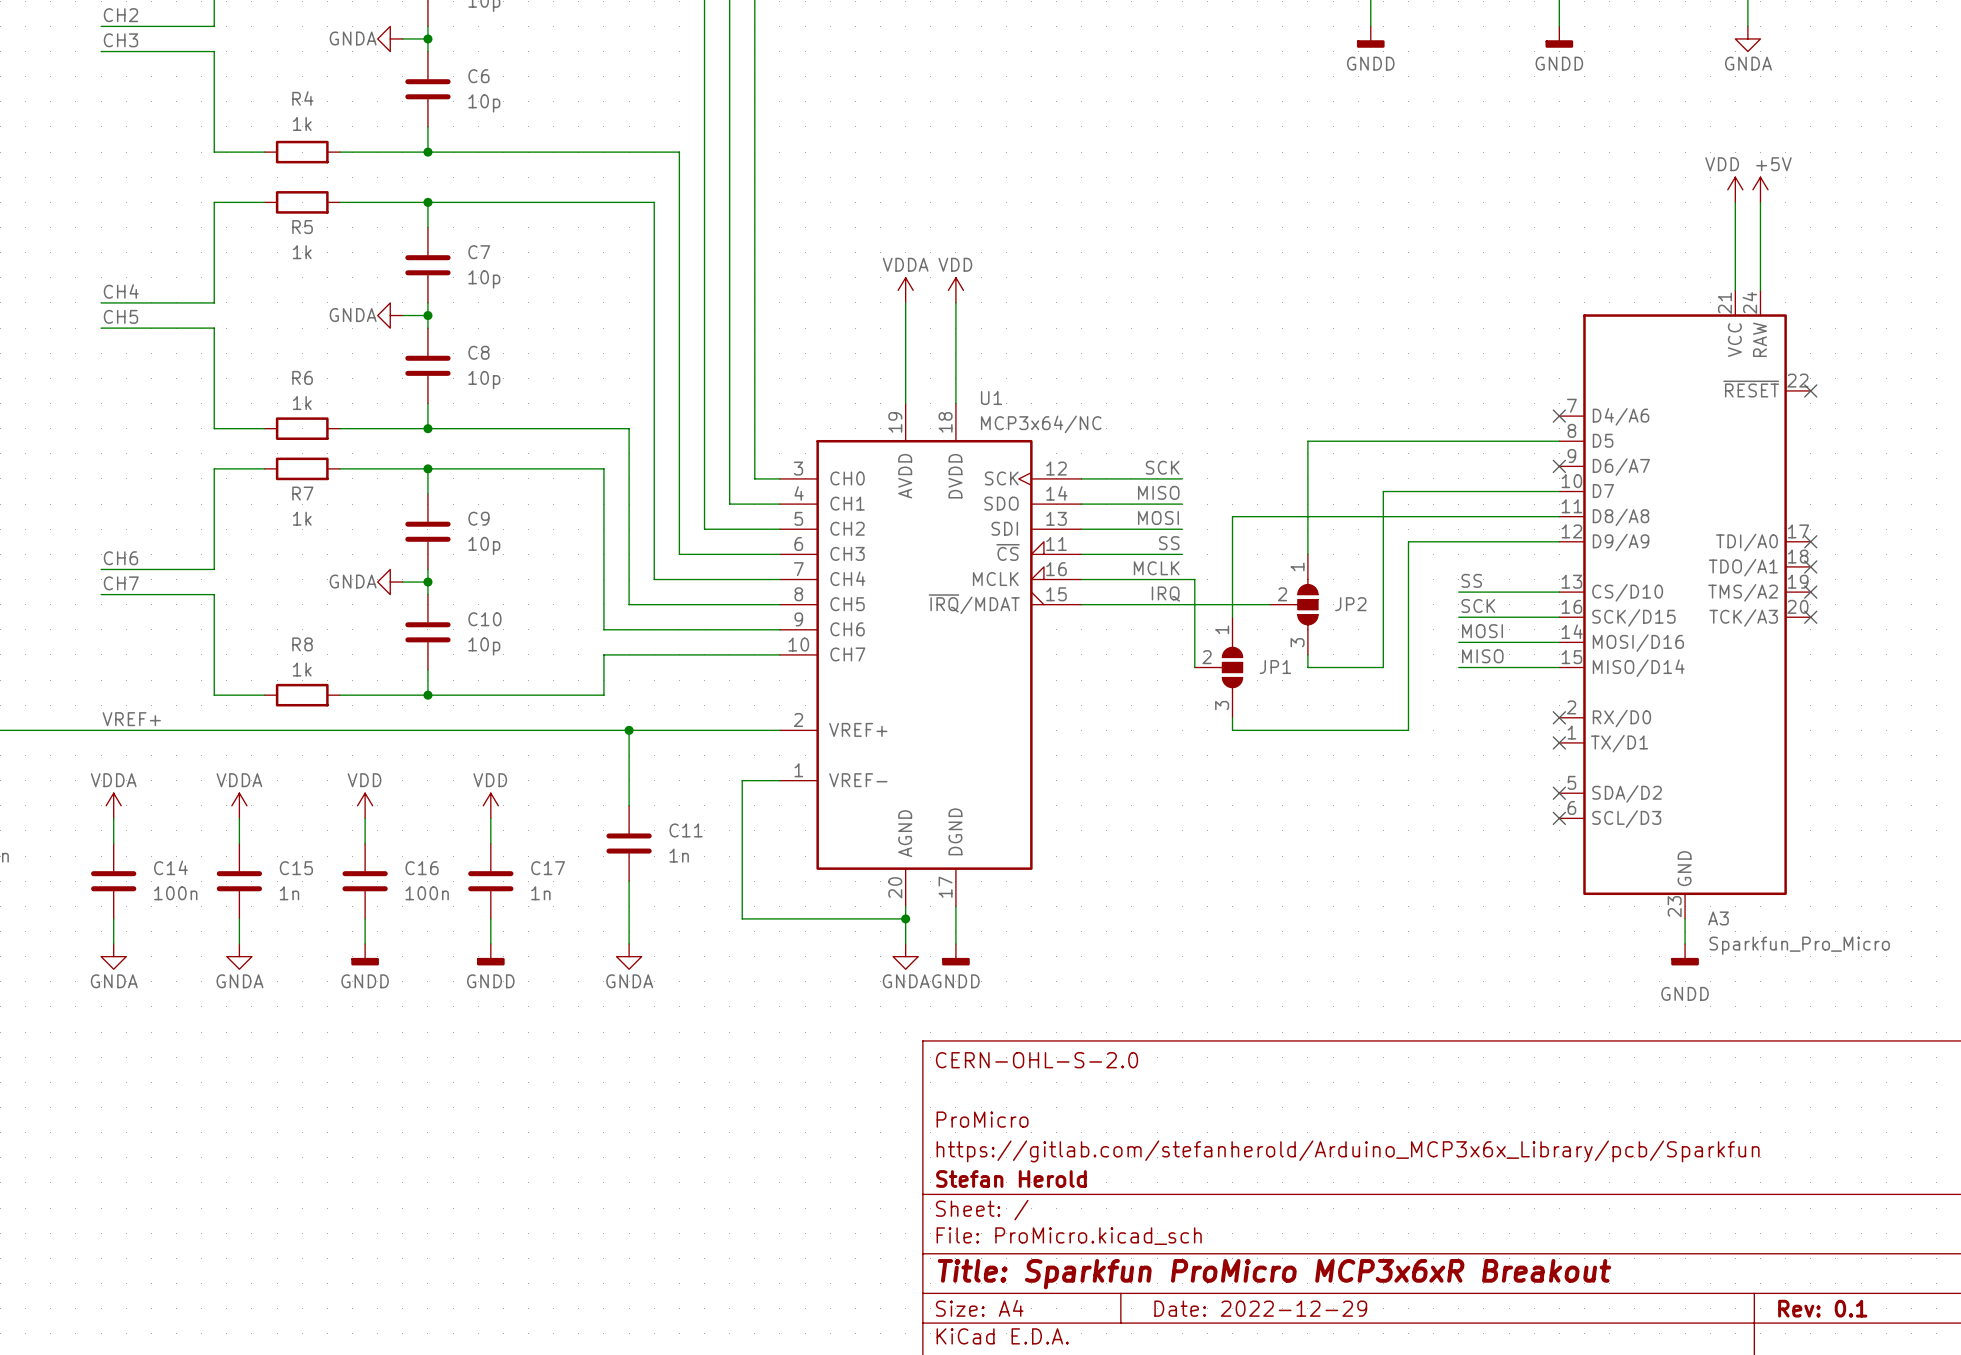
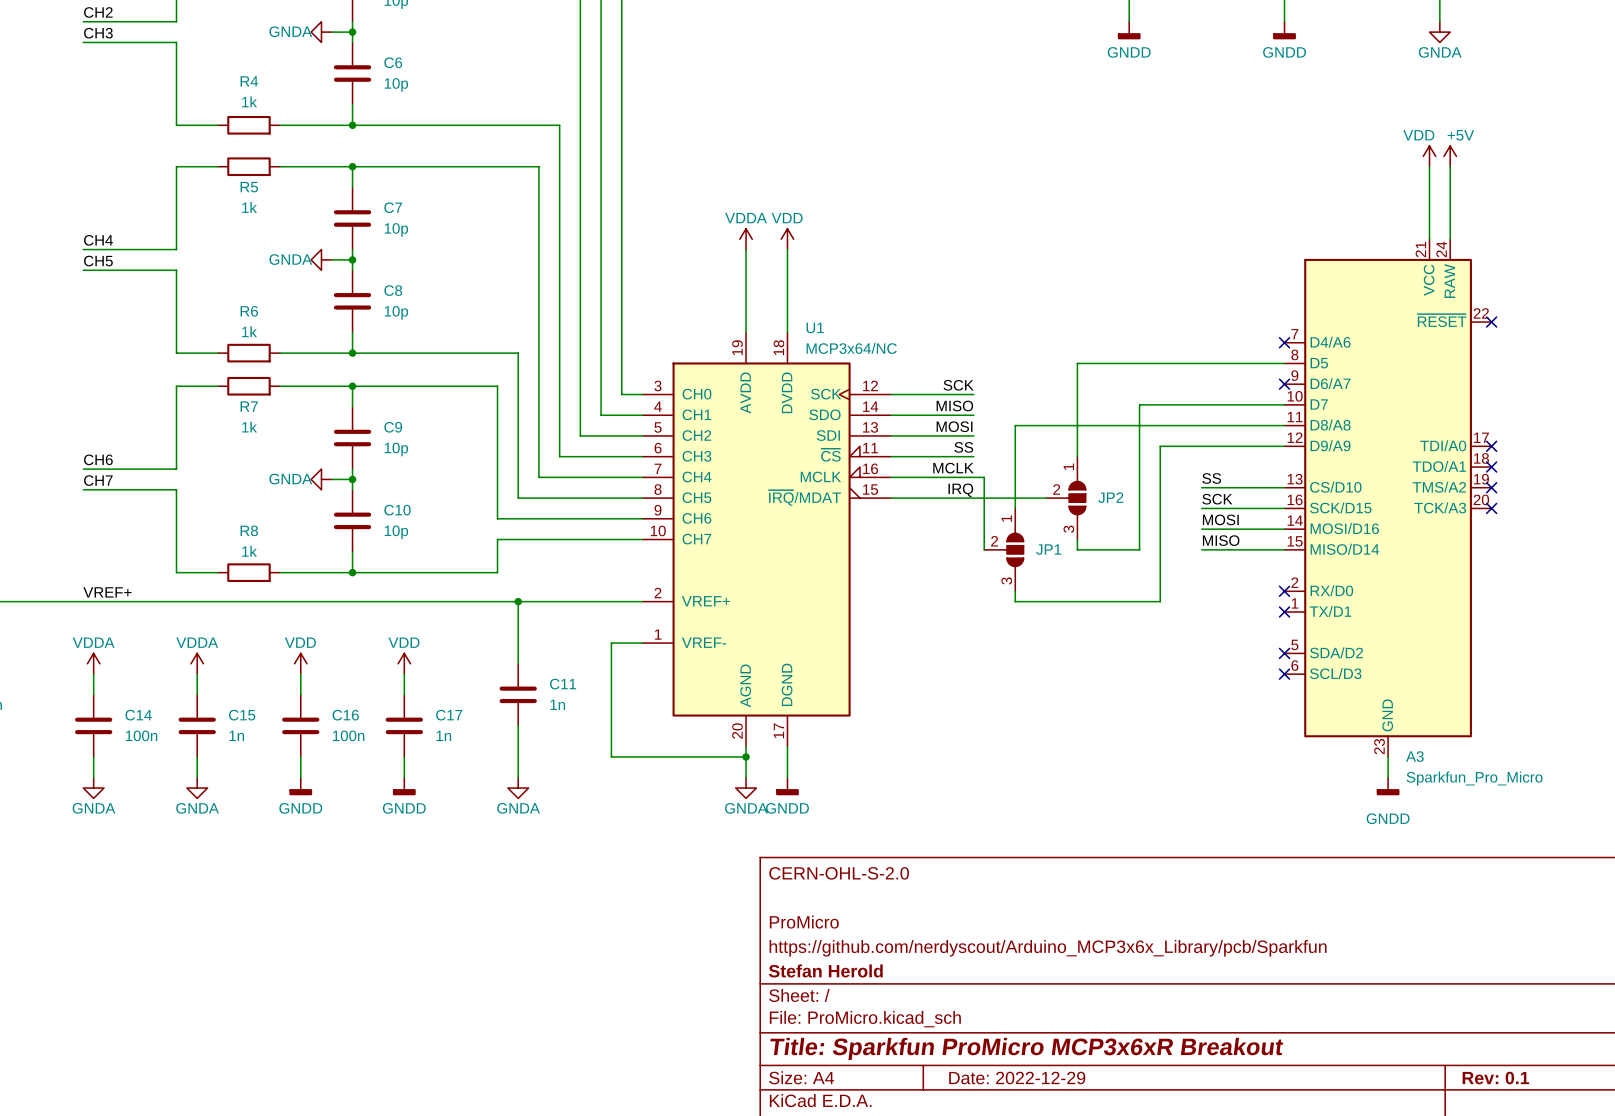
title block: https://gitlab.com/stefanherold/Arduino_MCP3x6x_Library/pcb/Sparkfun (1348, 1151) -> https://github.com/nerdyscout/Arduino_MCP3x6x_Library/pcb/Sparkfun (1048, 948)

